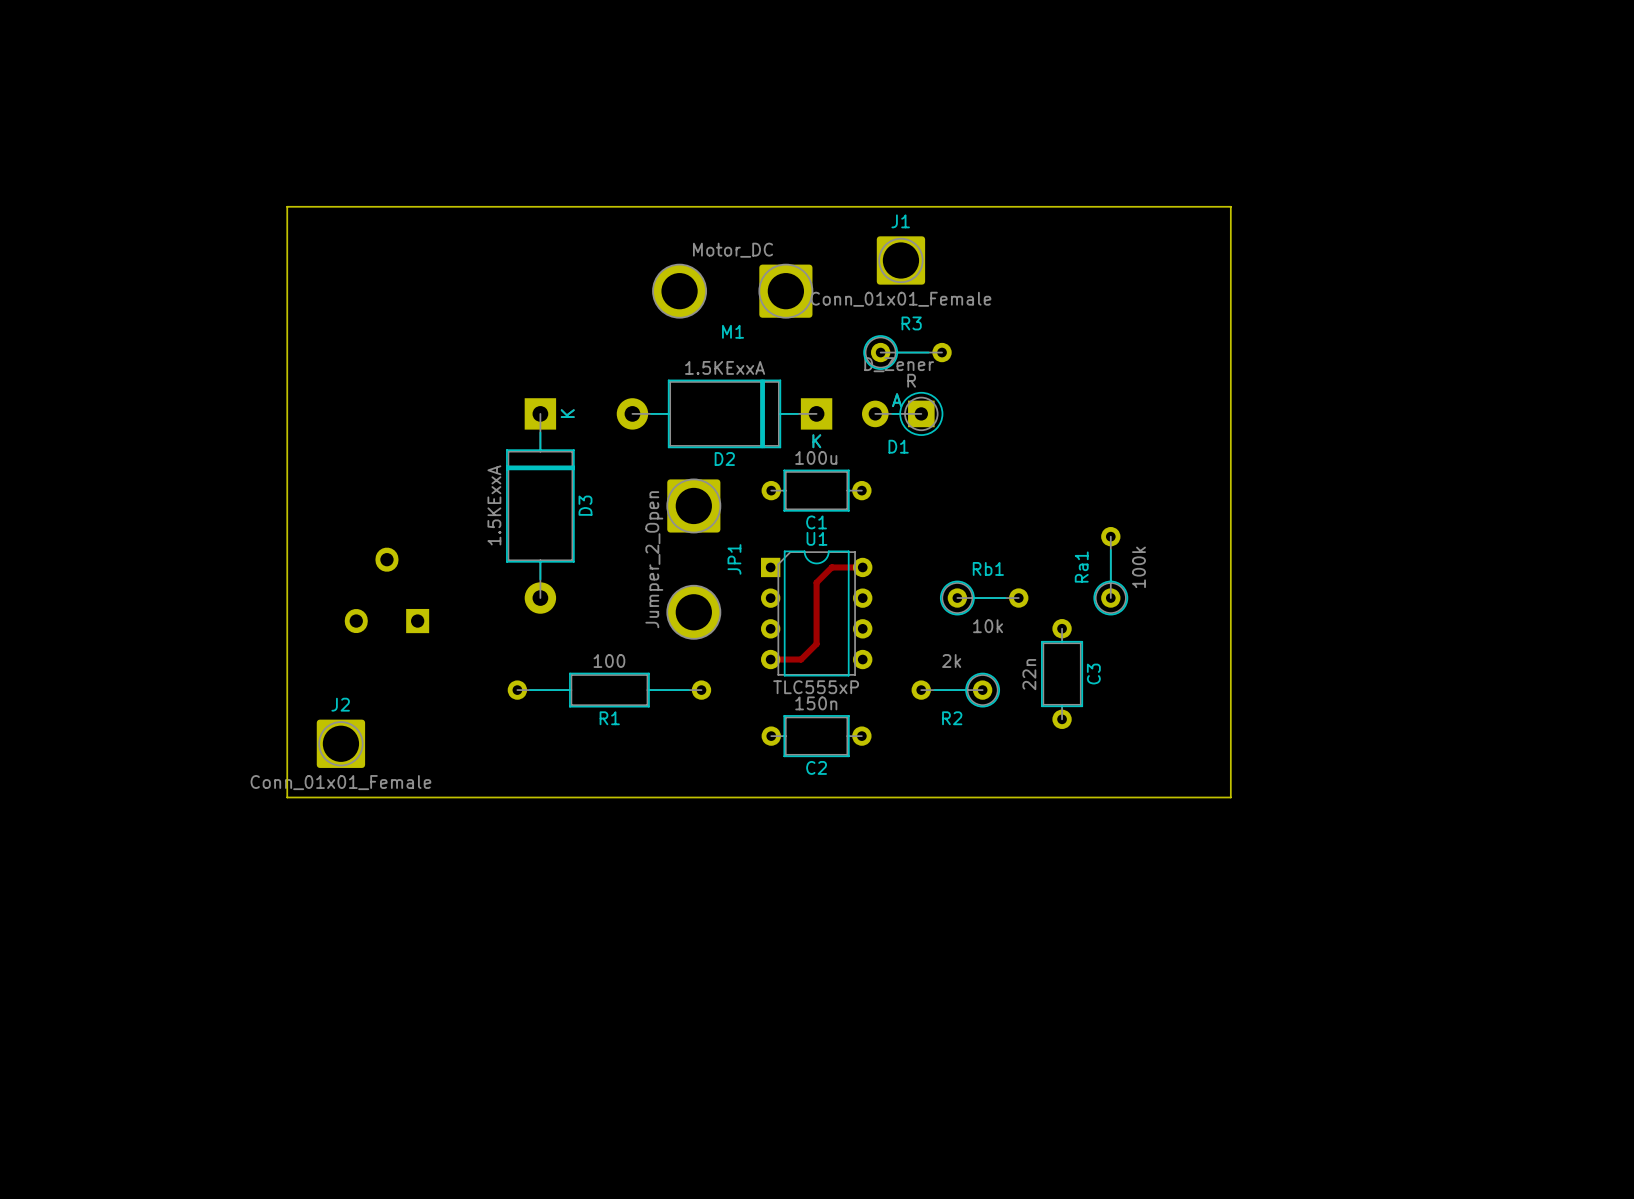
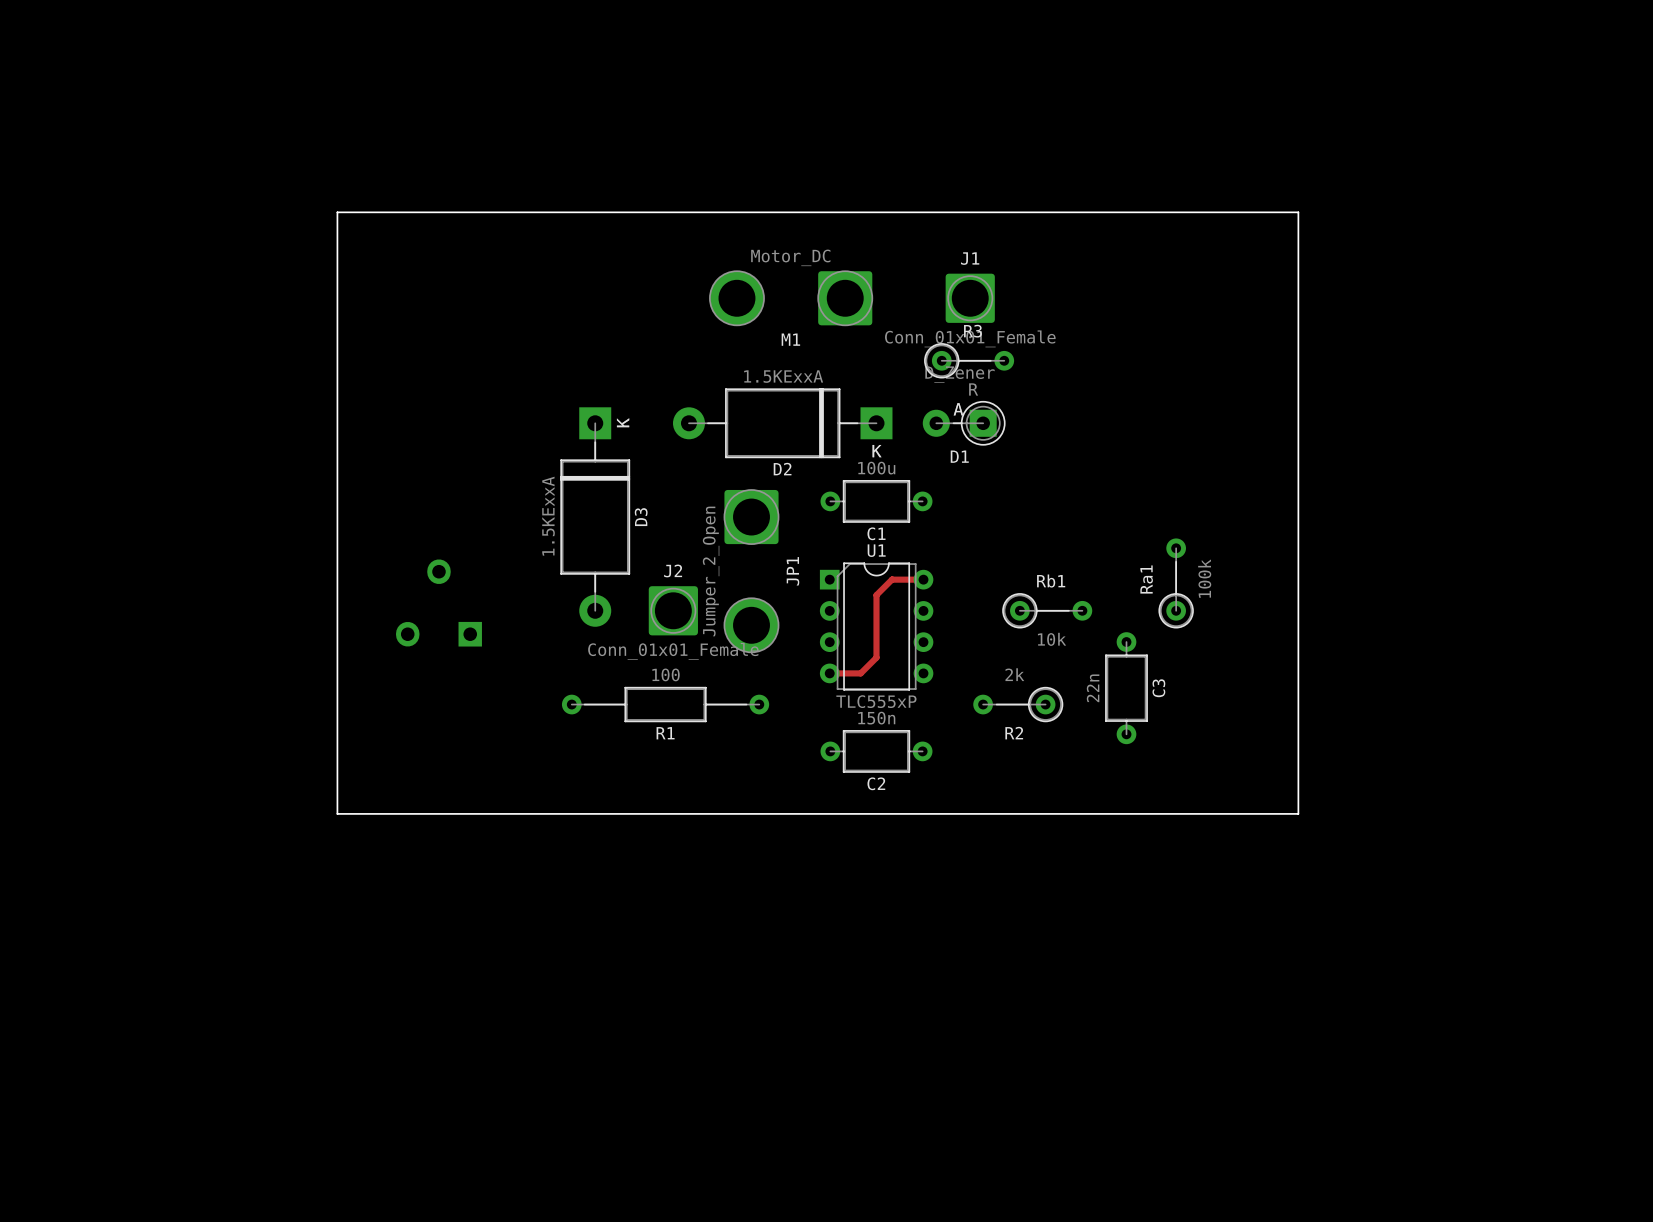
J1 position: (900, 260) -> (970, 298)
J2 position: (340, 743) -> (673, 610)

